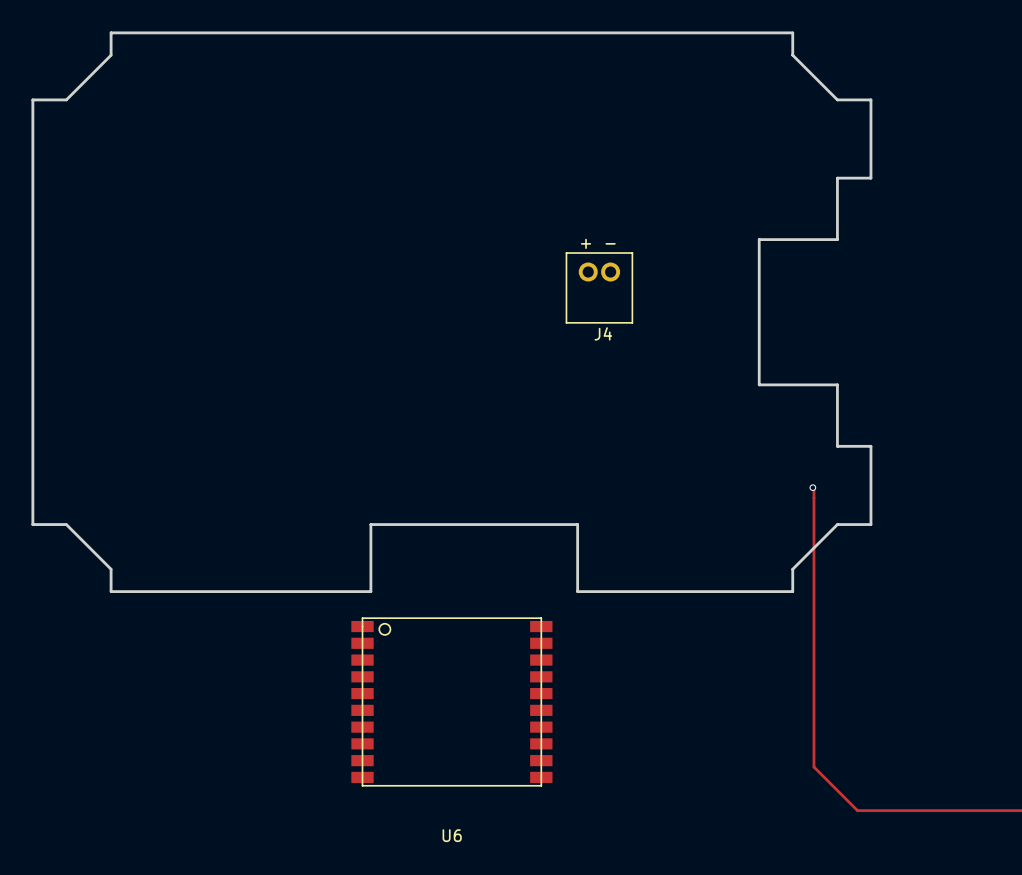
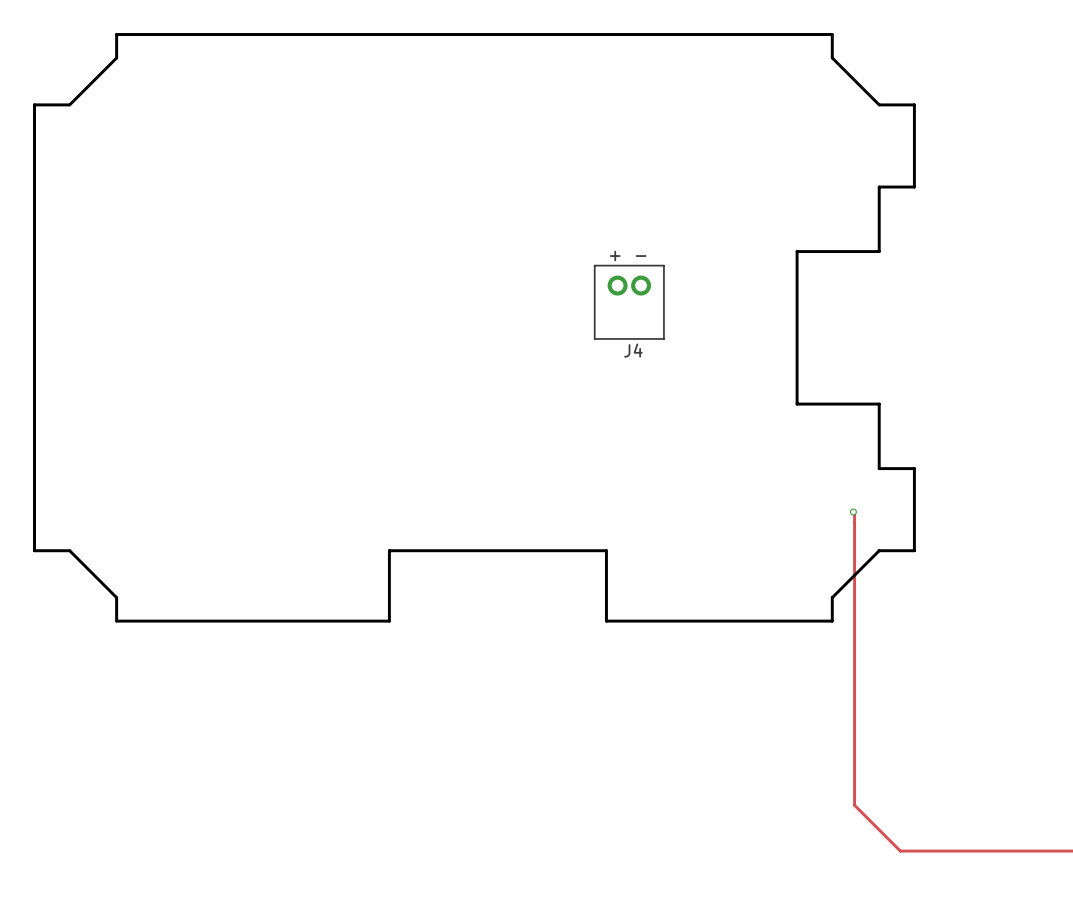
U6: (451, 701) -> none

